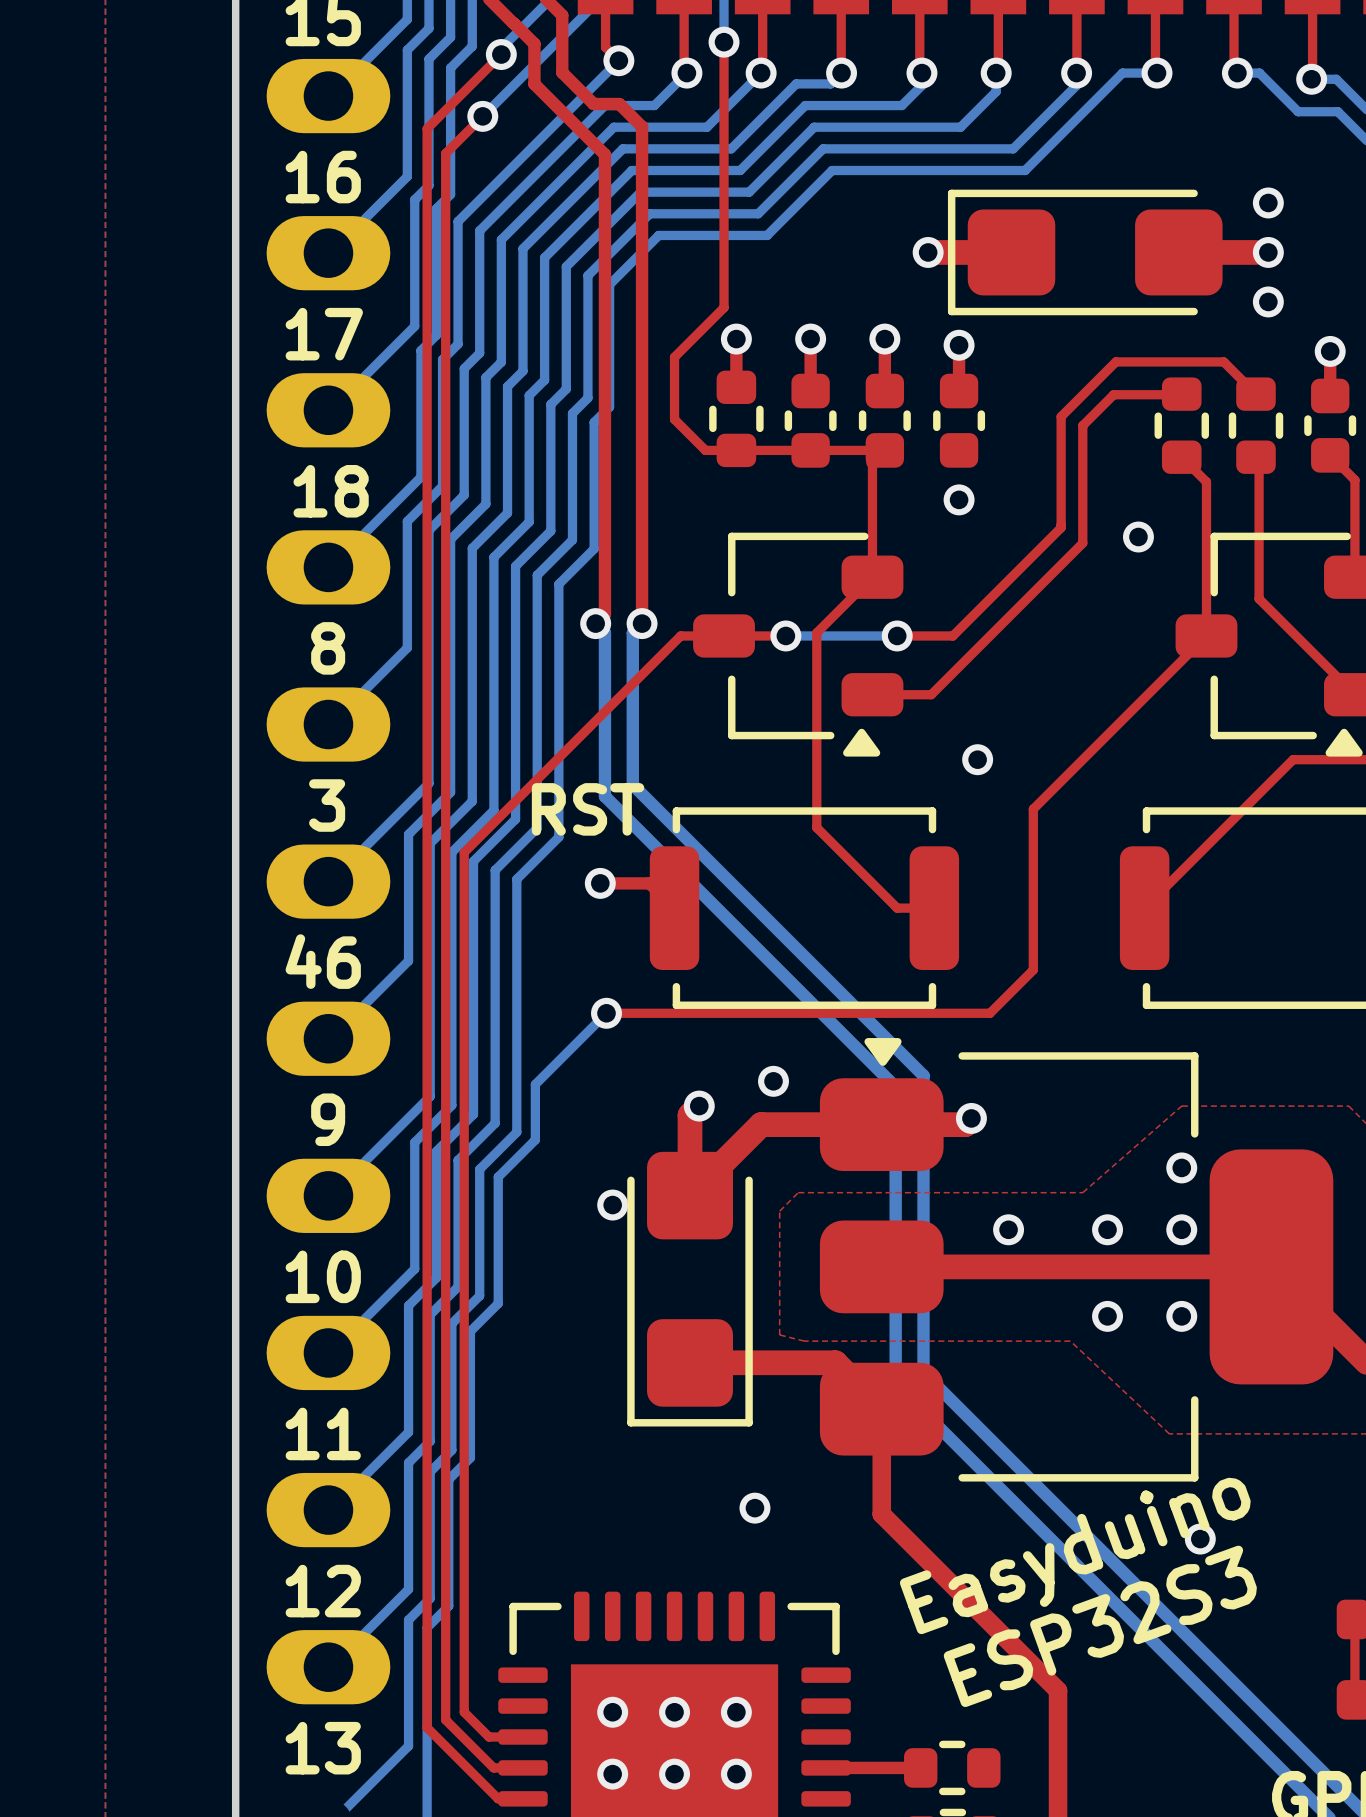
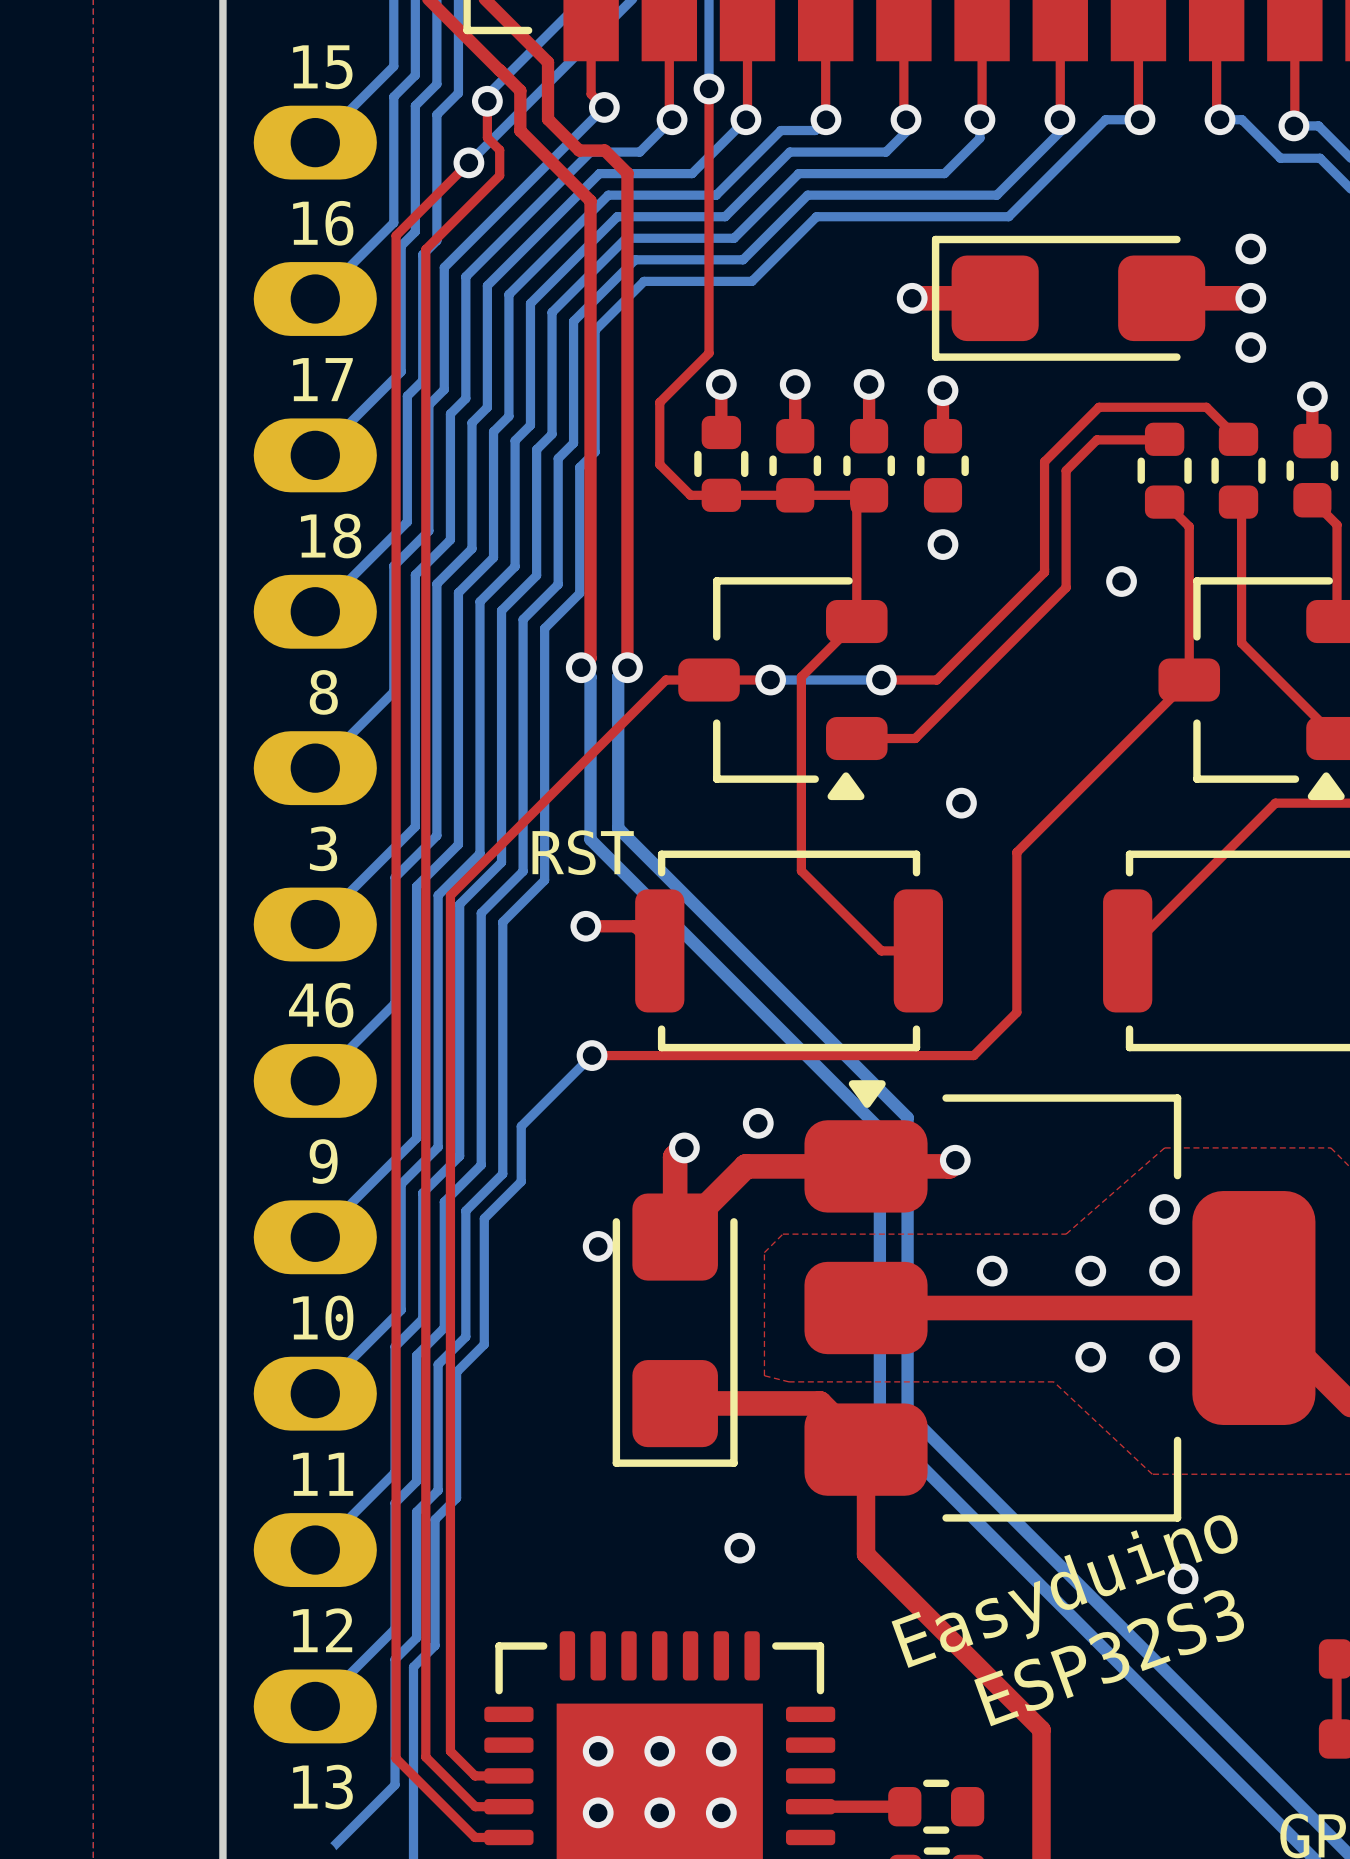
top track: (501, 54) (427, 128) (427, 1727) (498, 1798) -> (487, 101) (487, 137) (499, 150) (499, 175) (425, 249) (425, 1757) (475, 1806) (479, 1806)
top track: (445, 153) (445, 1719) (493, 1767) -> (431, 199) (396, 235) (396, 1758) (475, 1837) (484, 1837)

